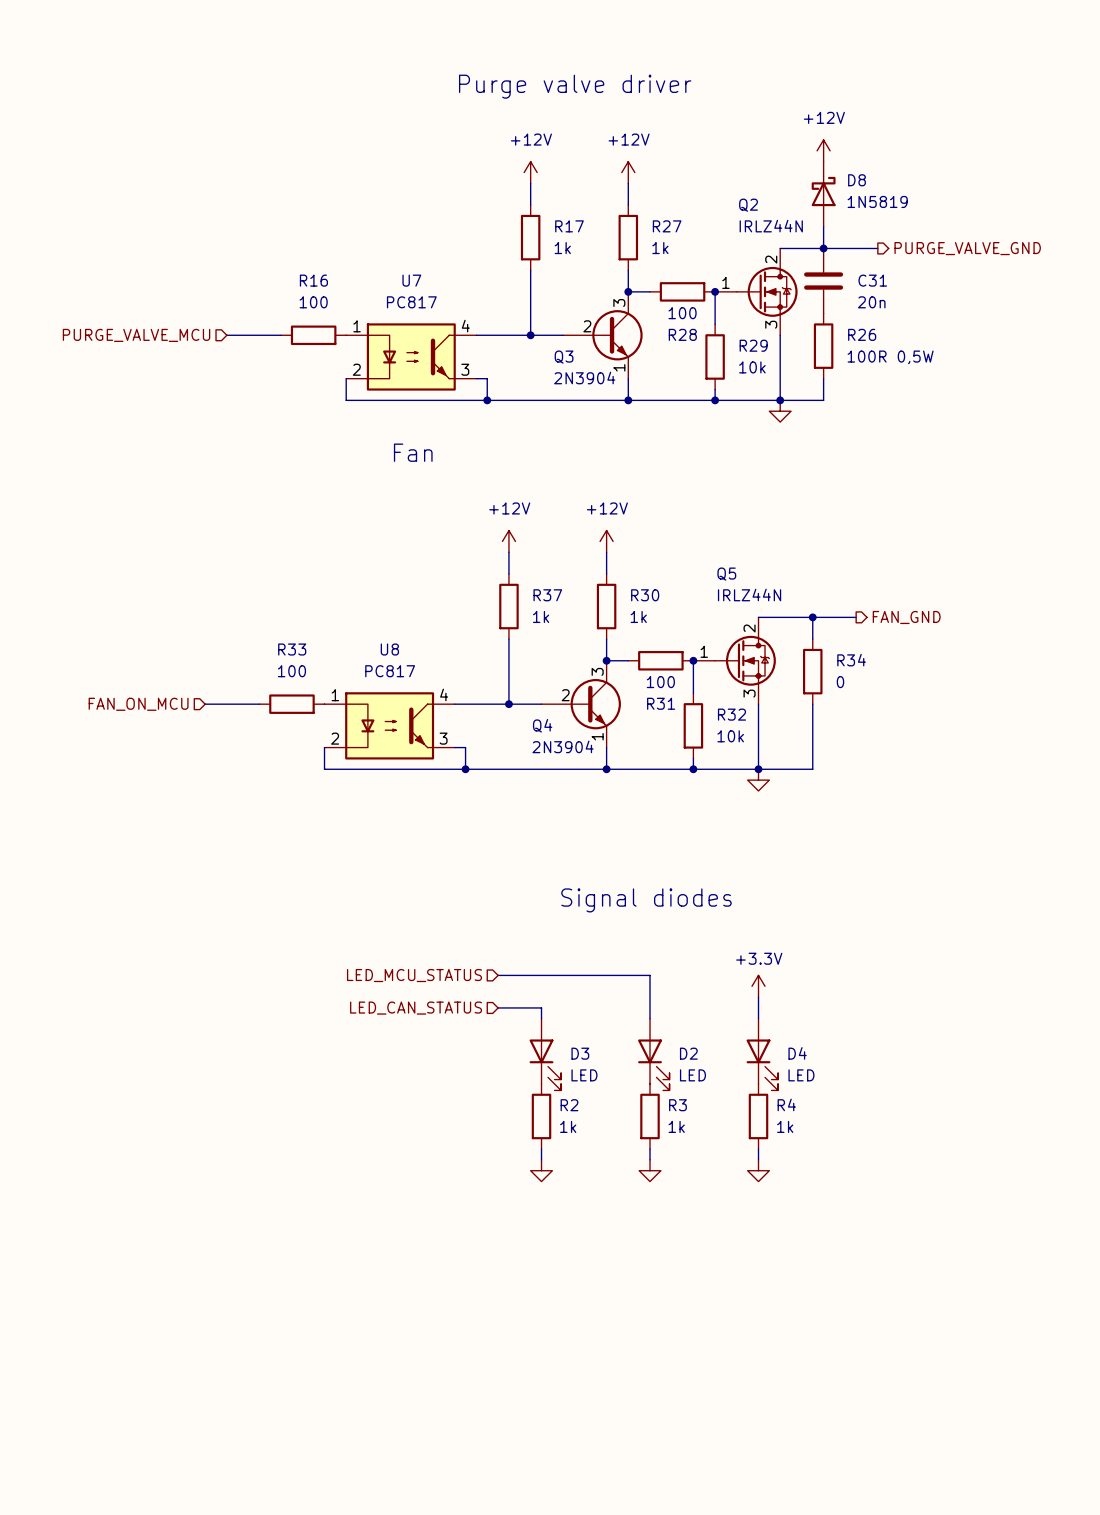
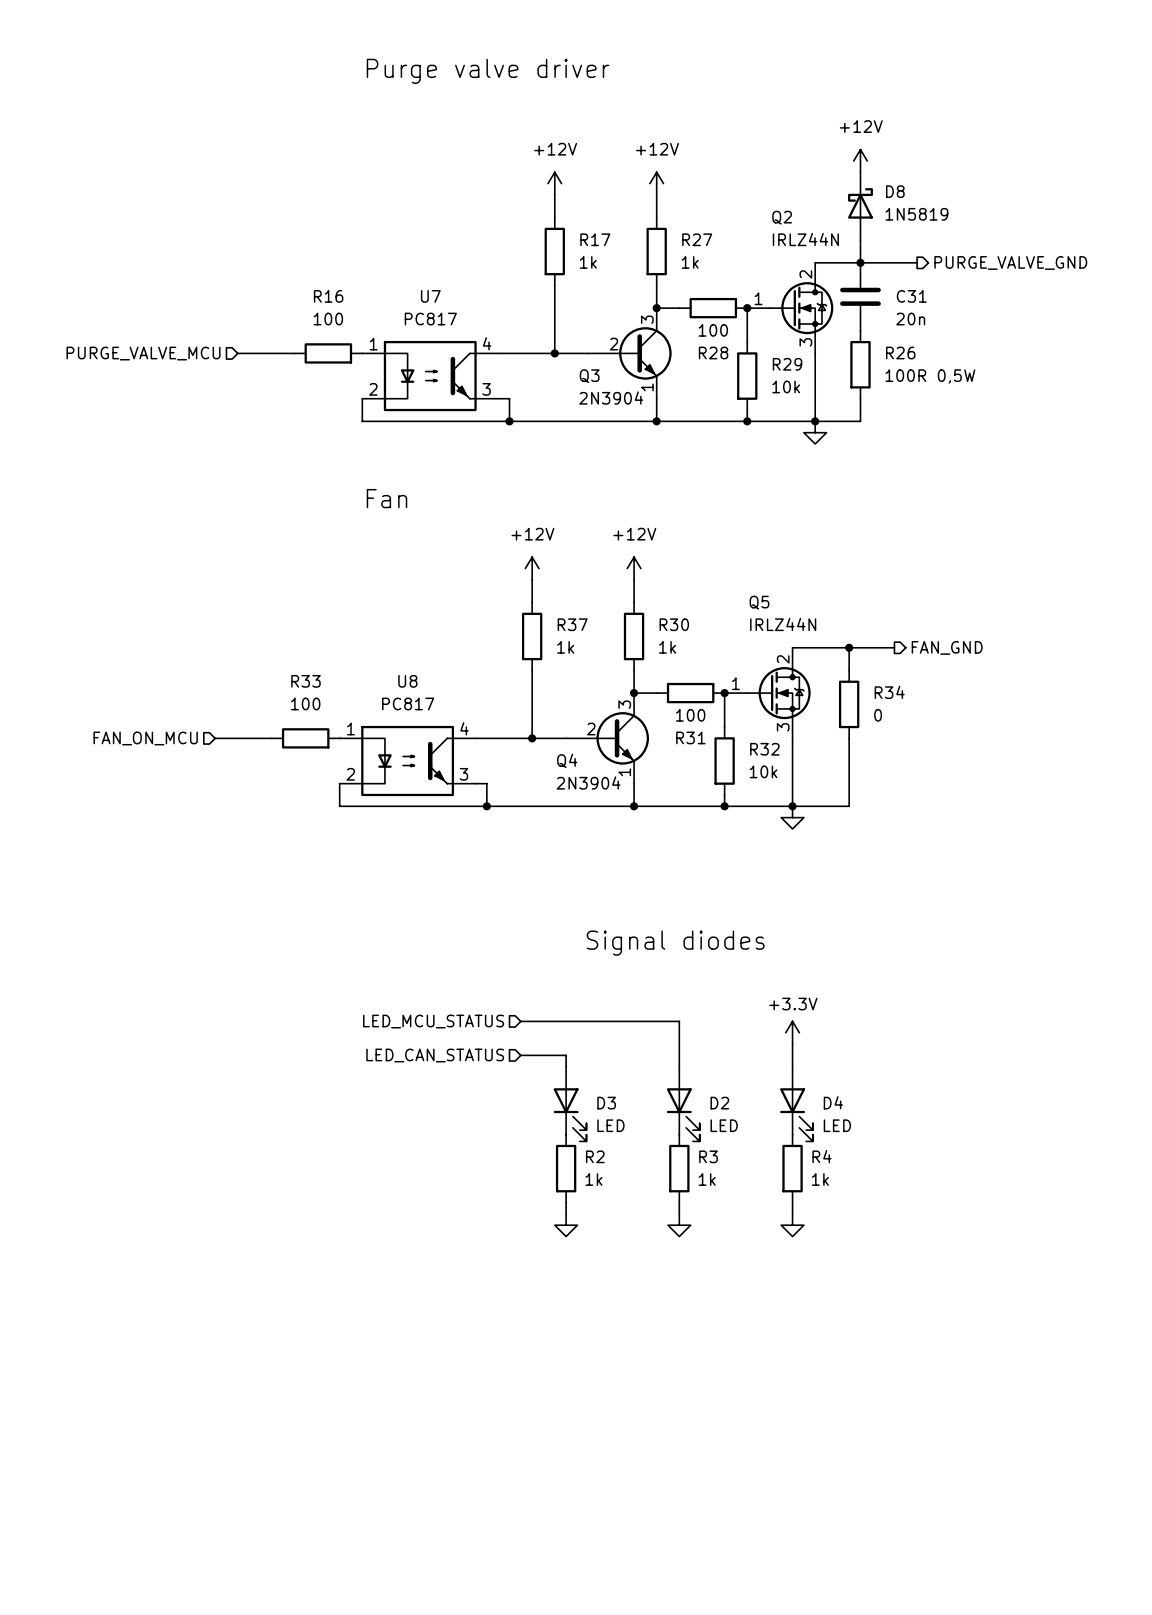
text position: Purge valve driver (575, 86) -> Purge valve driver (488, 71)
text position: Fan (413, 452) -> Fan (386, 498)

